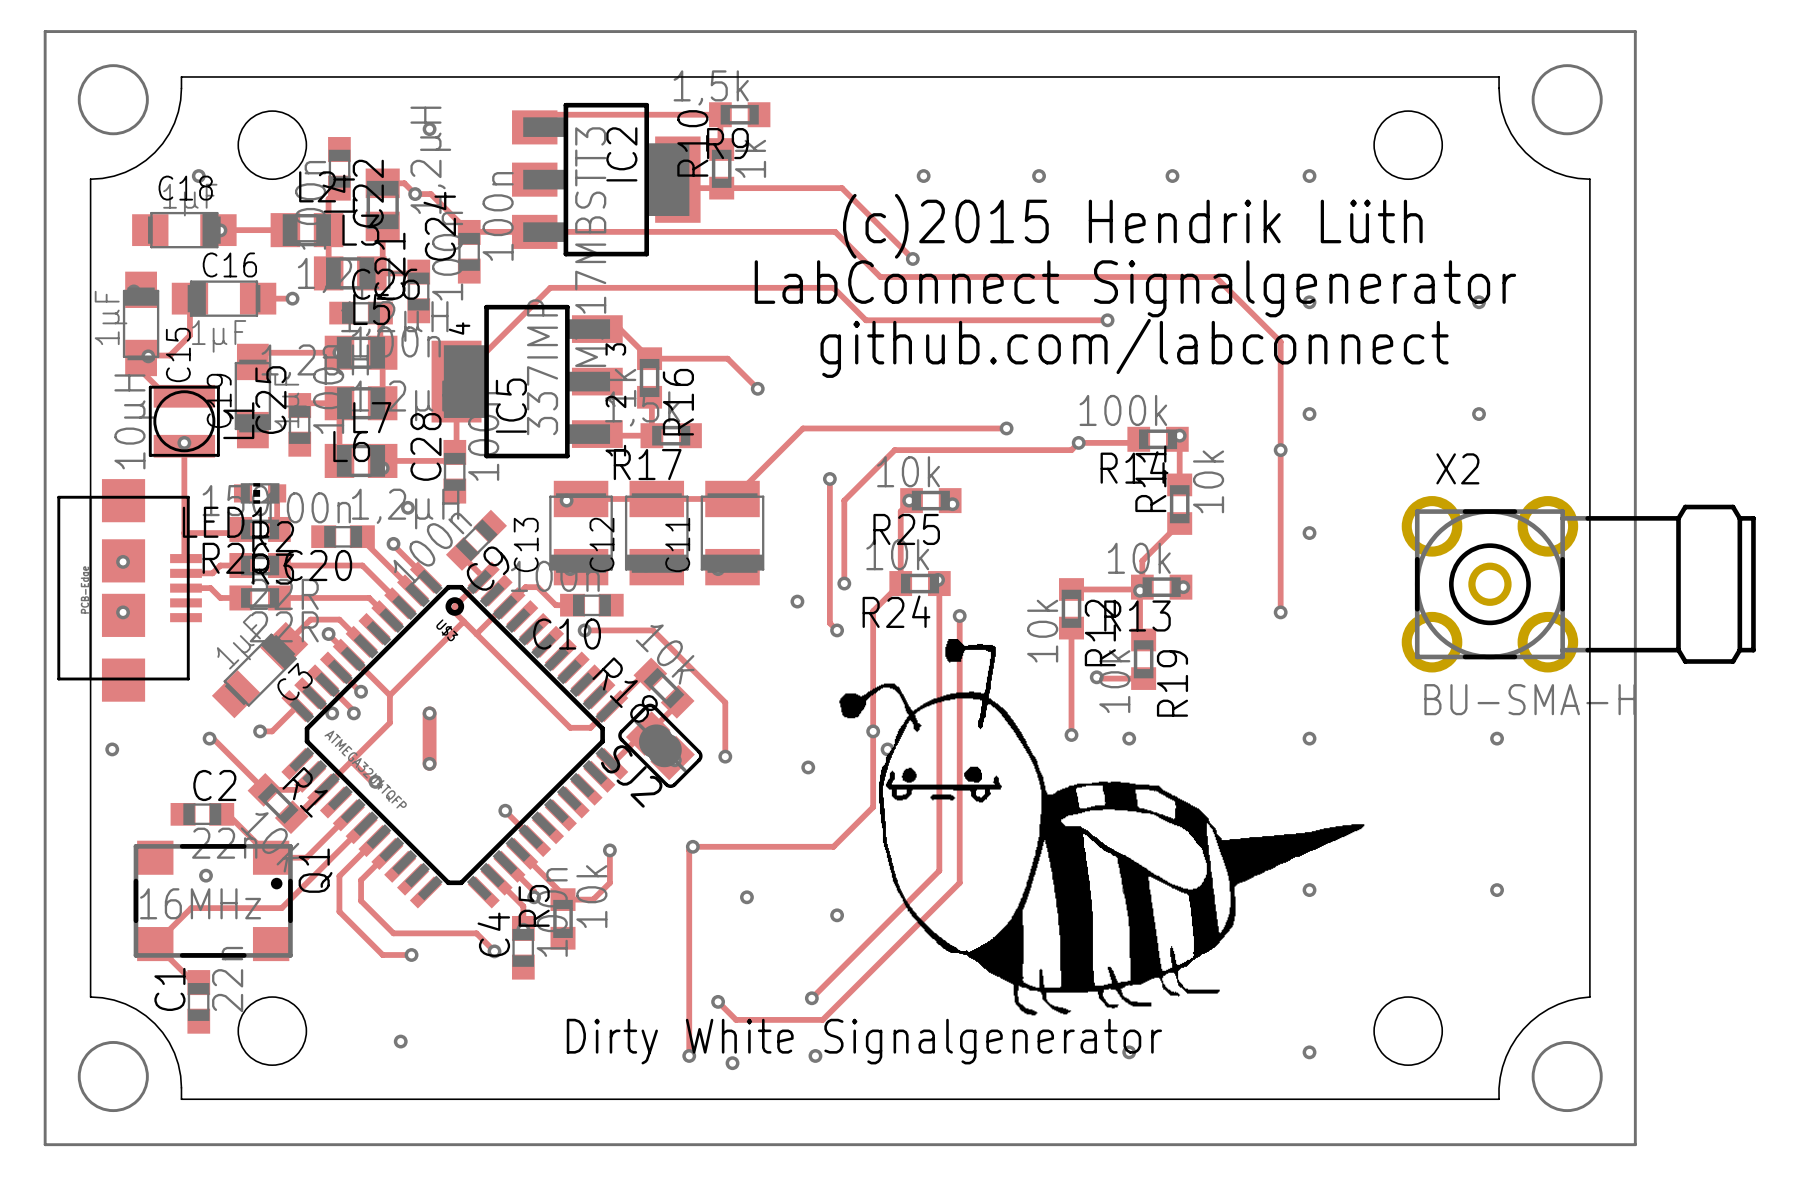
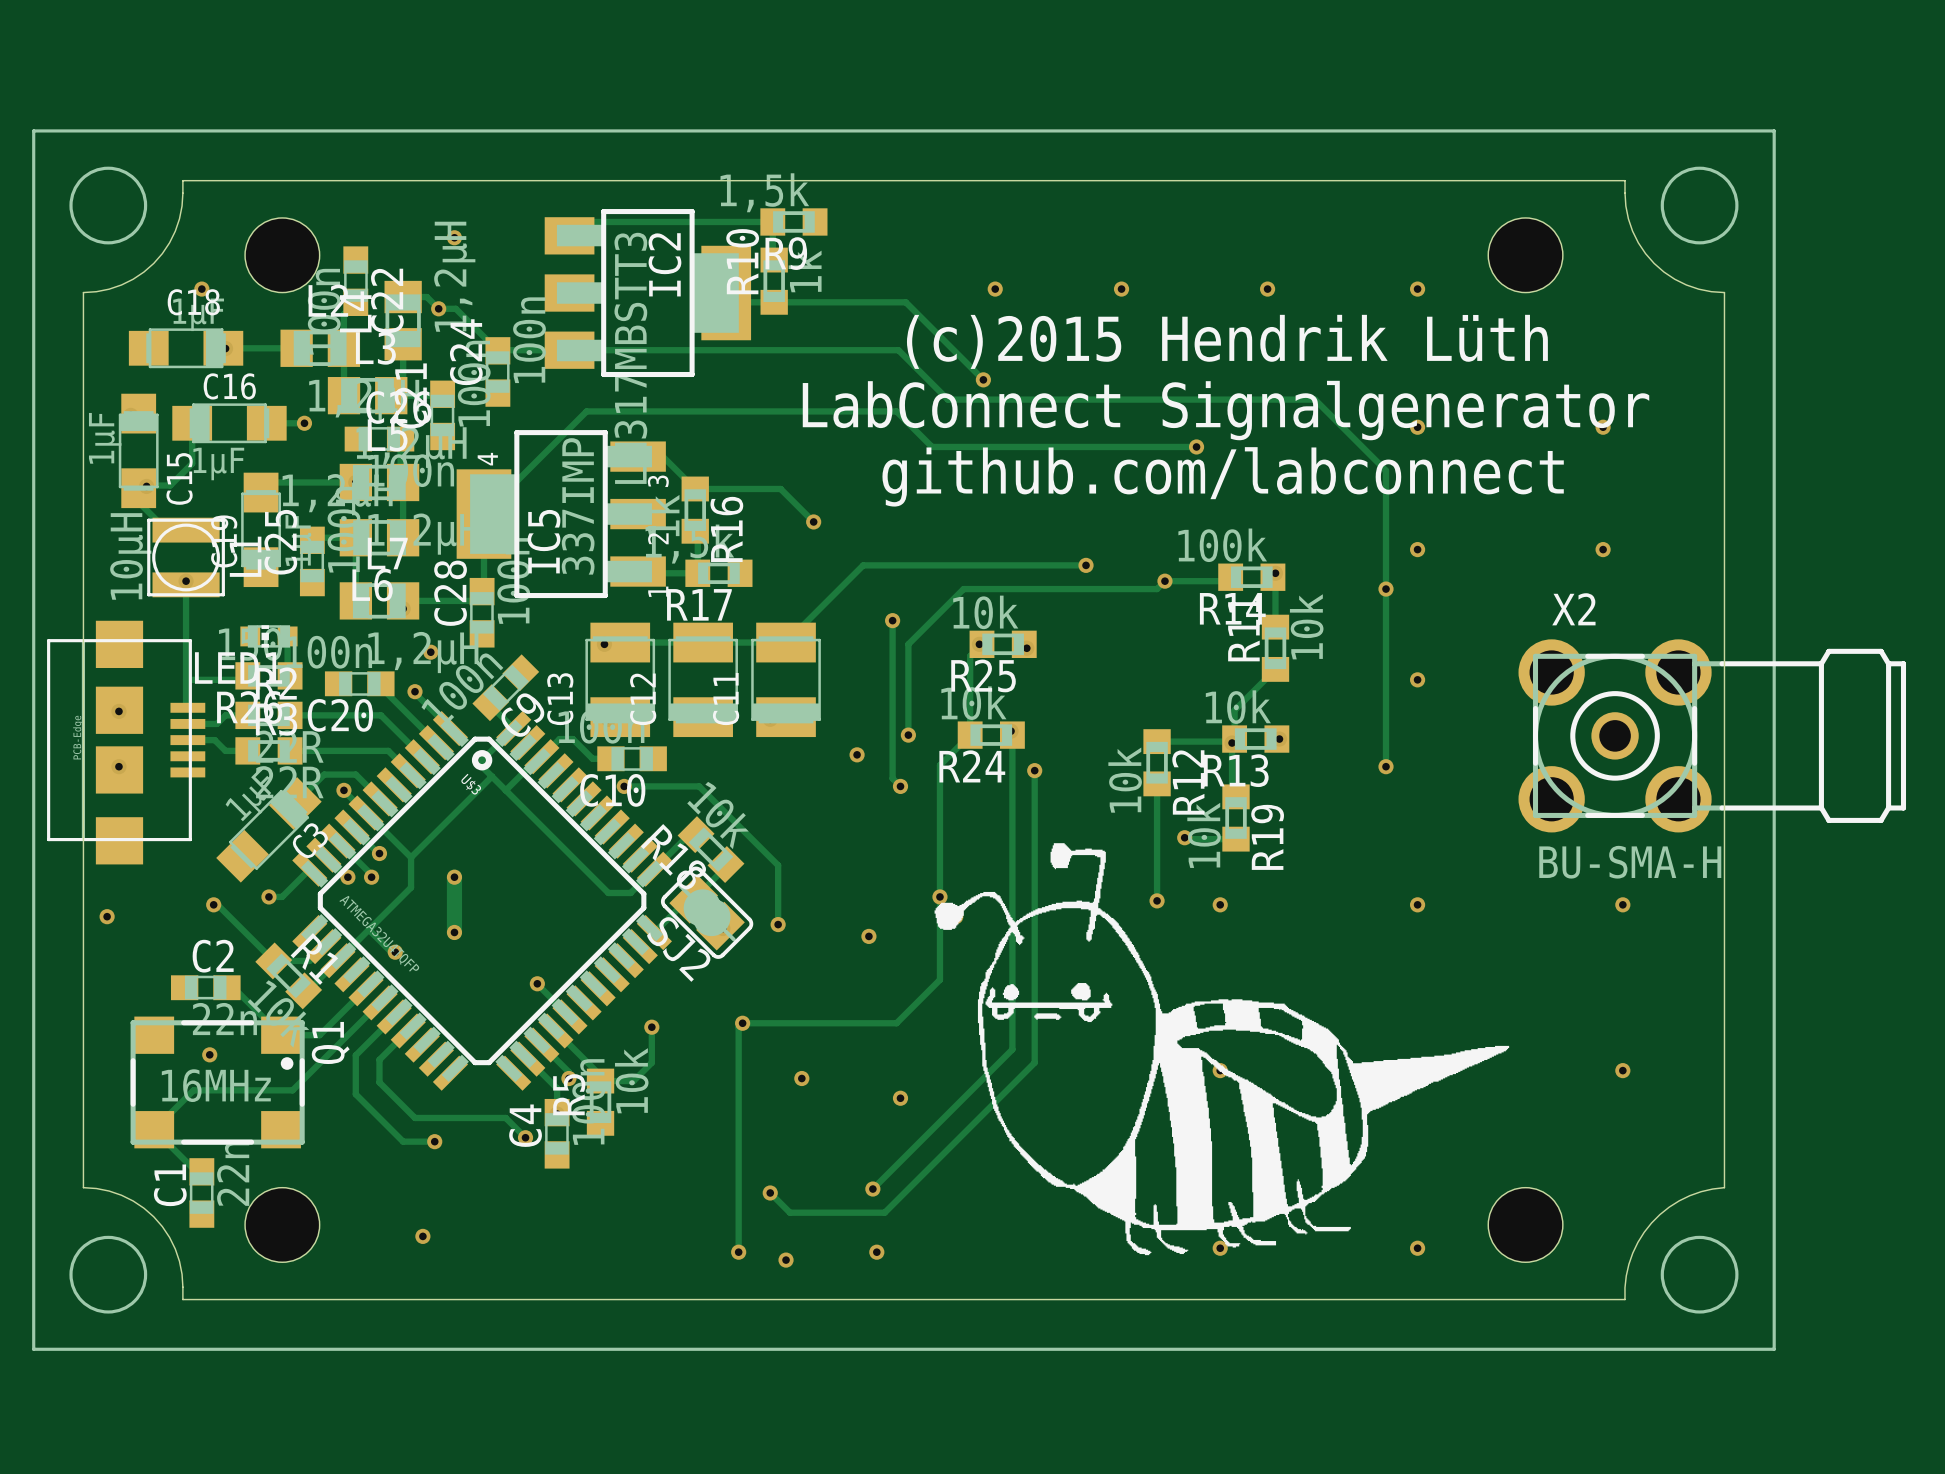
drawing position: (1101, 827) -> (1221, 1049)
text: Dirty White Signalgenerator (864, 1041) -> none

